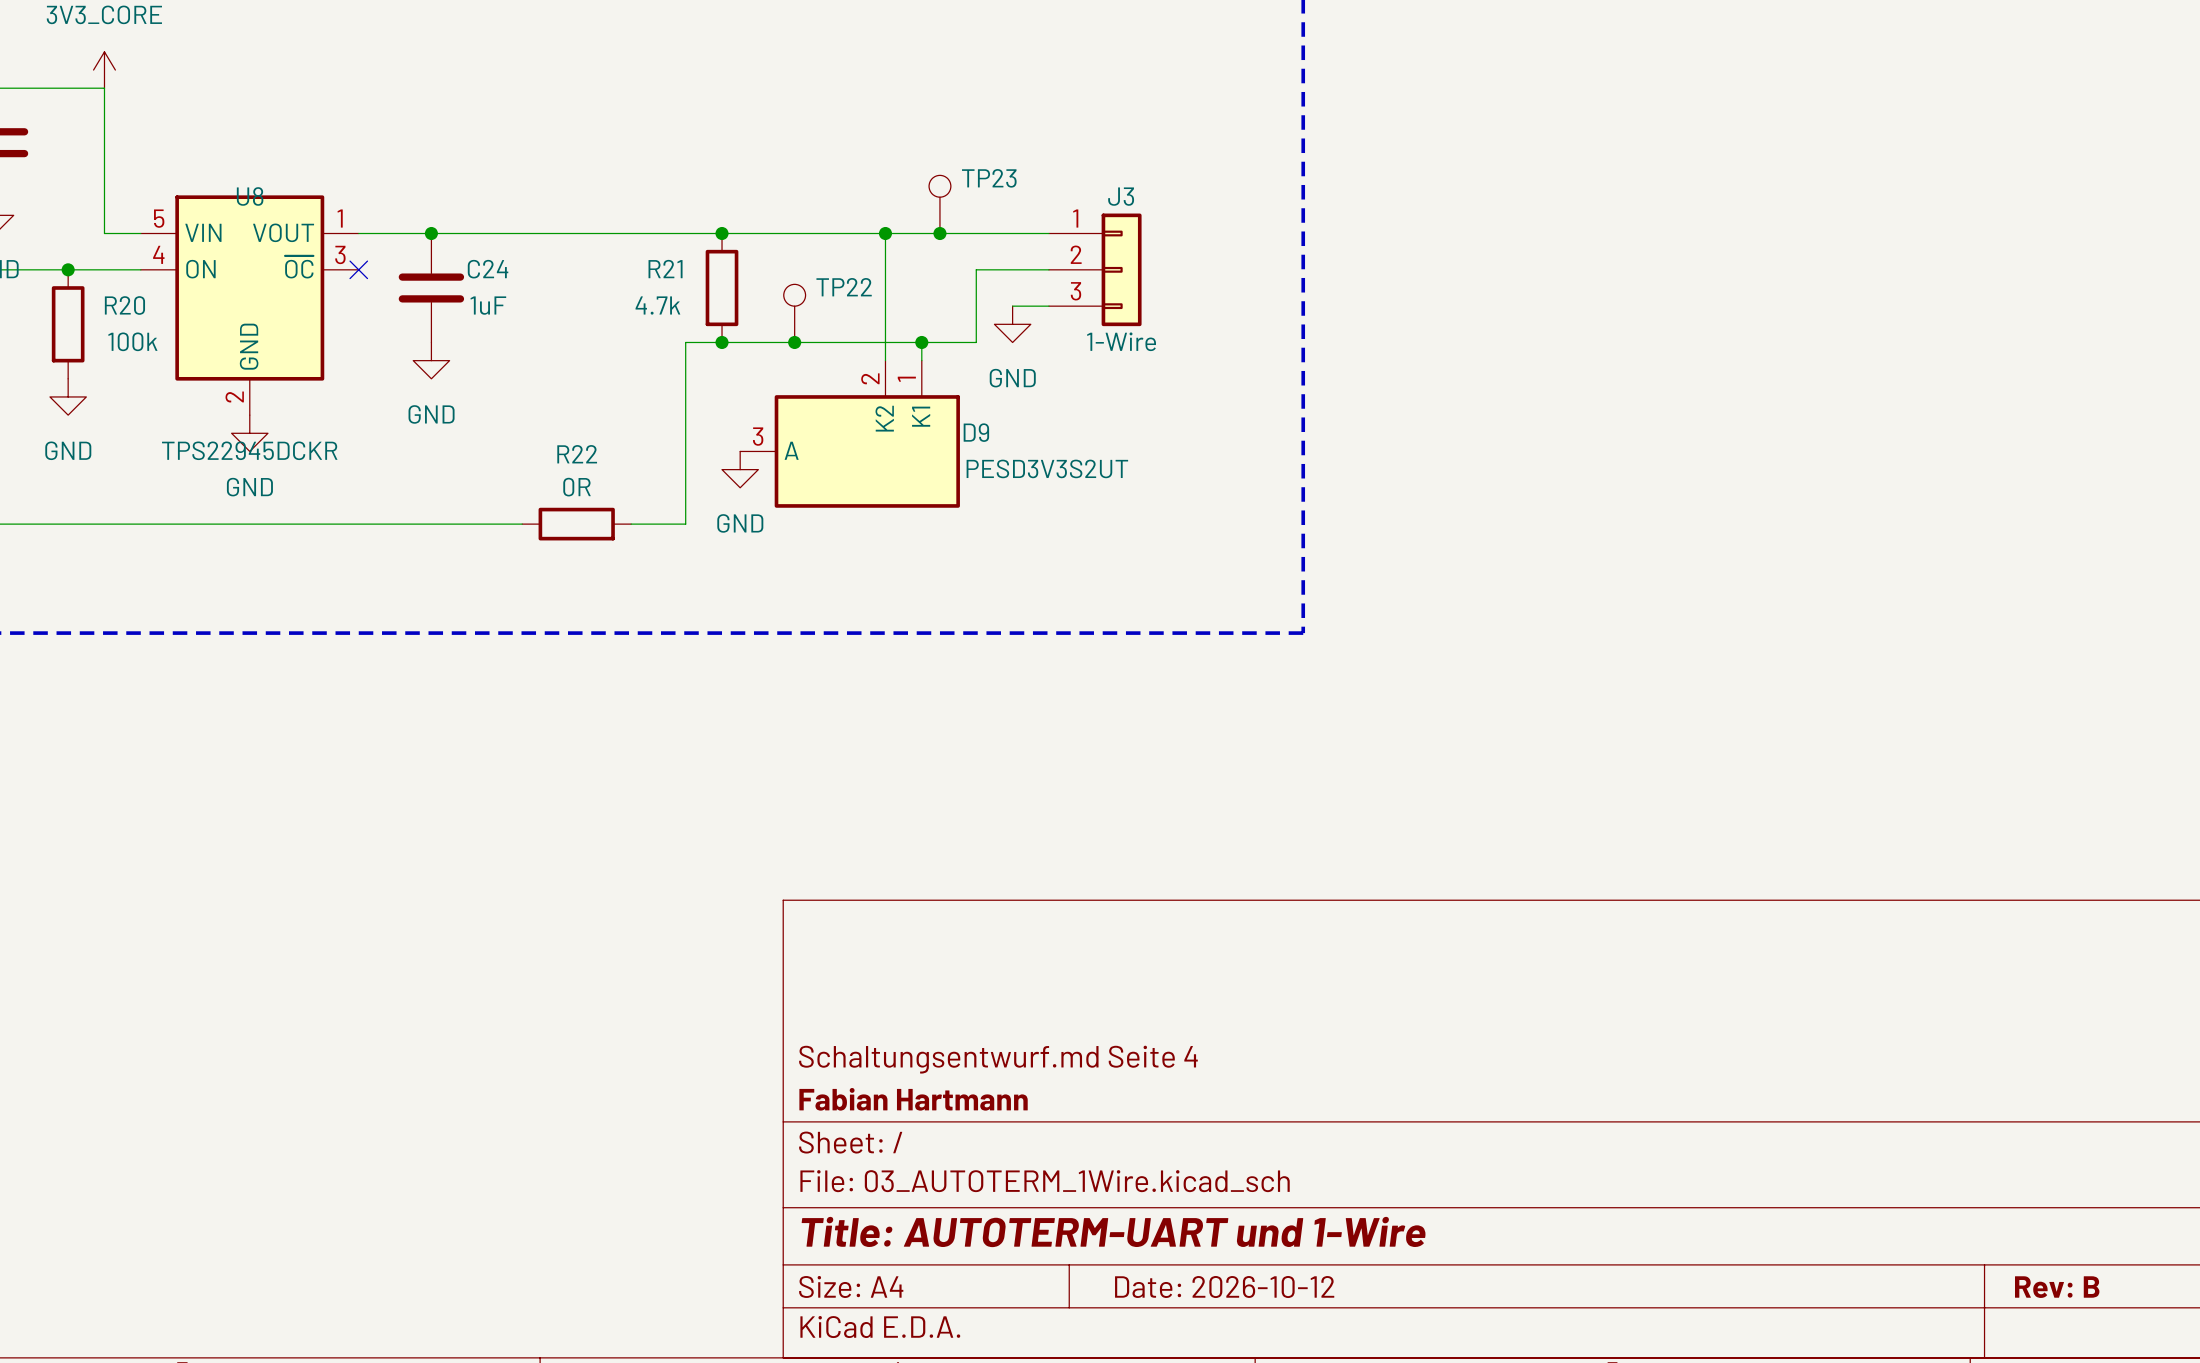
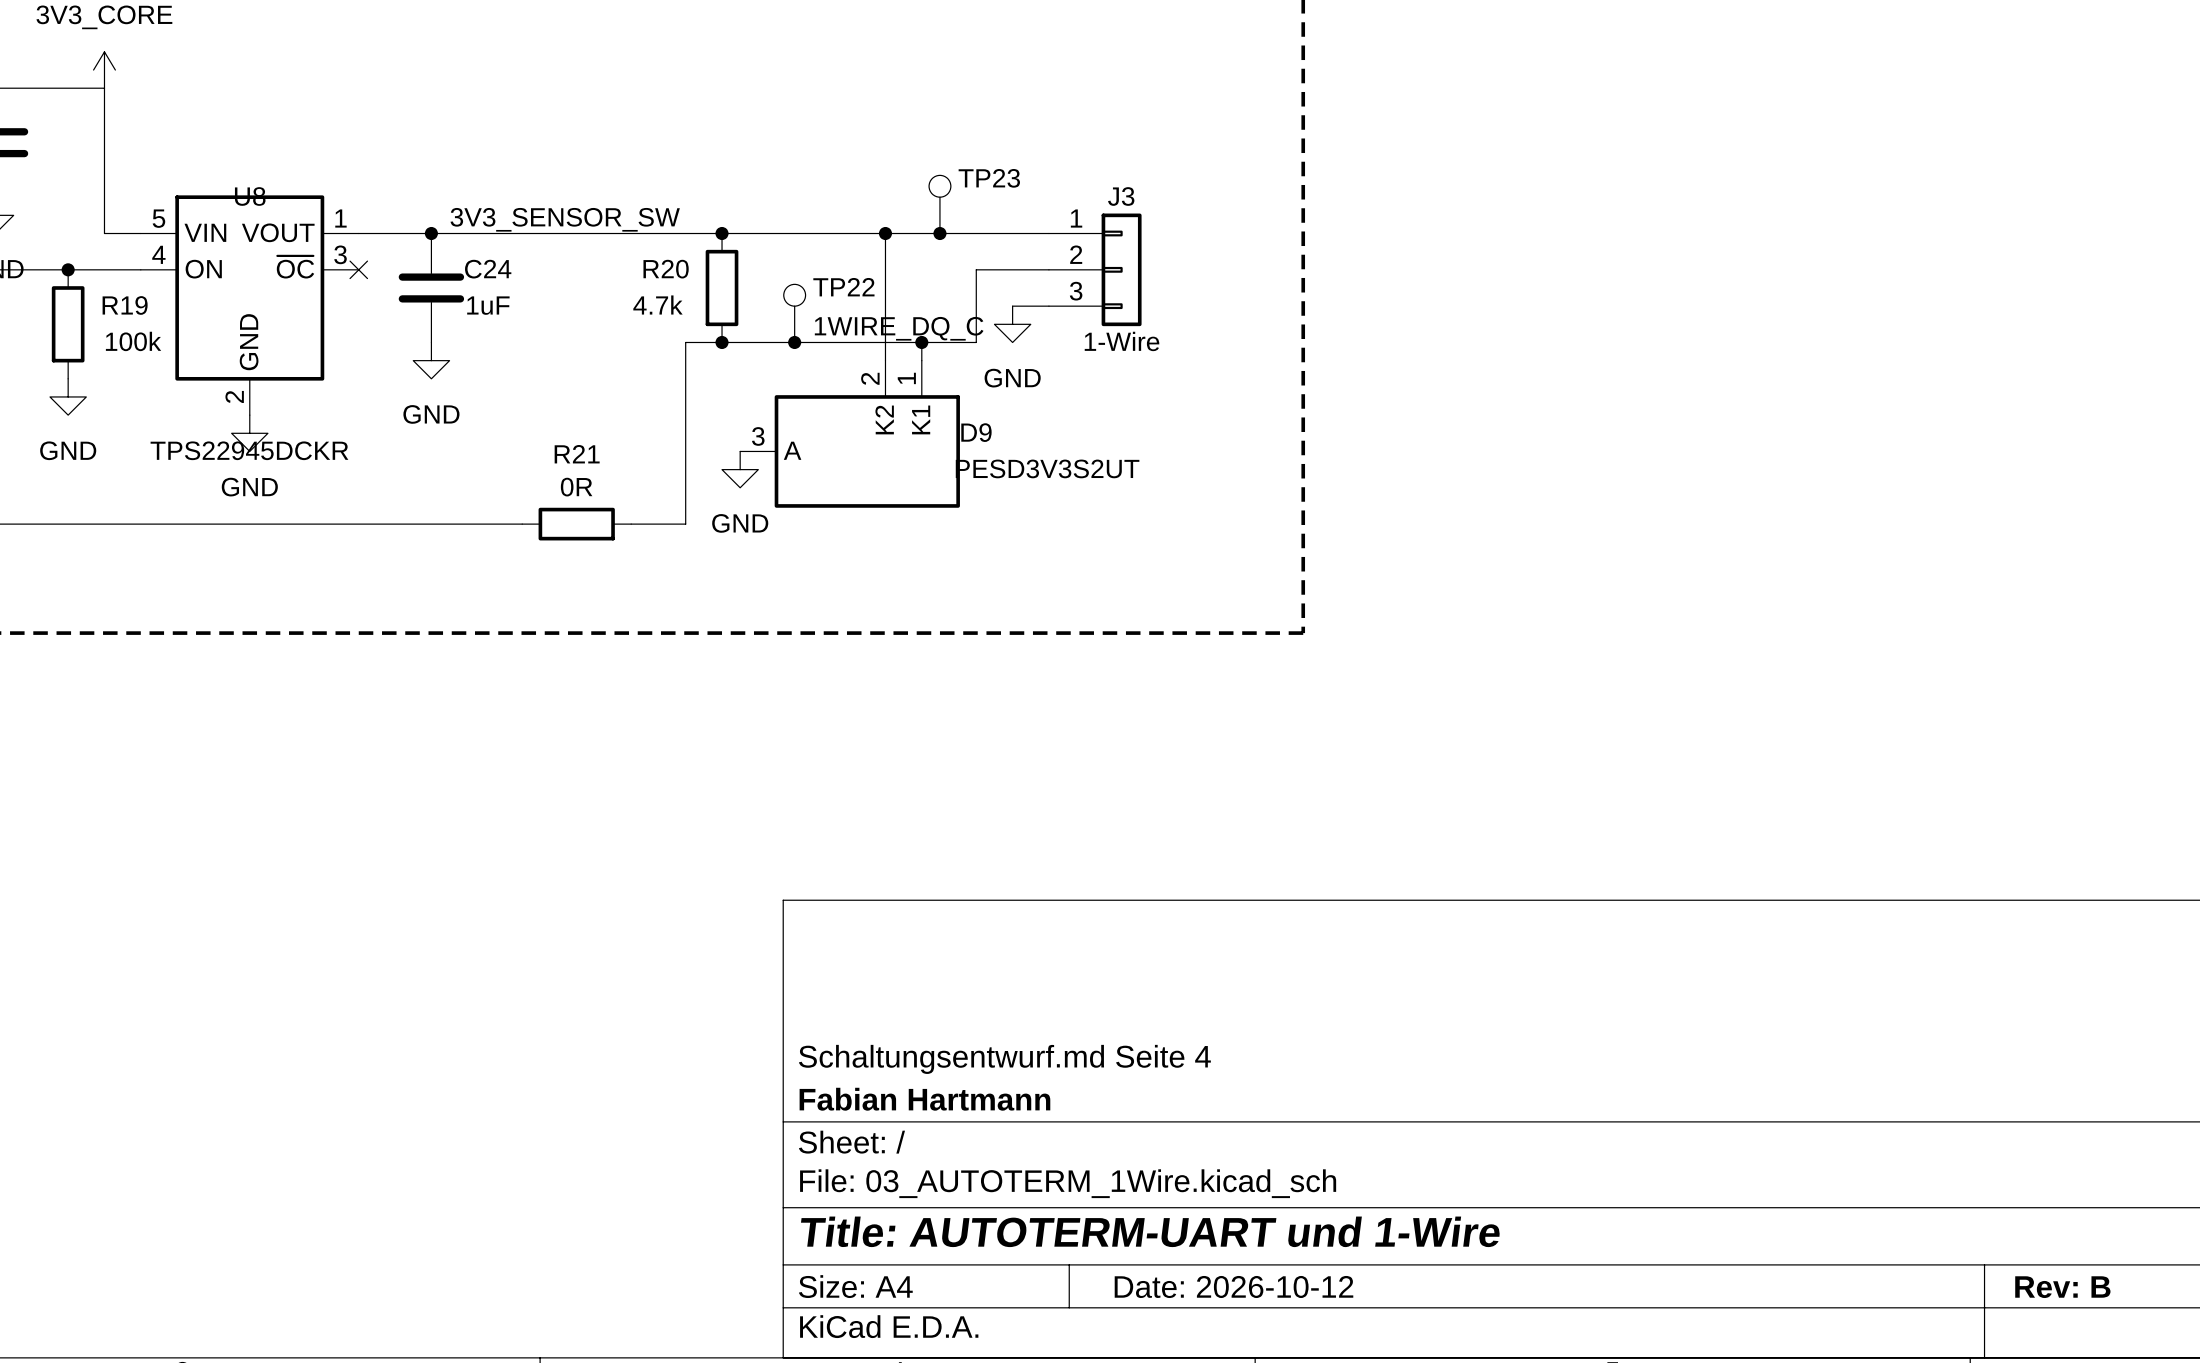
label: none -> 3V3_SENSOR_SW (565, 219)
R21 name: R21 (665, 269) -> R20 (666, 269)
R20 name: R20 (124, 305) -> R19 (125, 305)
label: none -> 1WIRE_DQ_C (899, 328)
R22 name: R22 (577, 454) -> R21 (577, 454)

